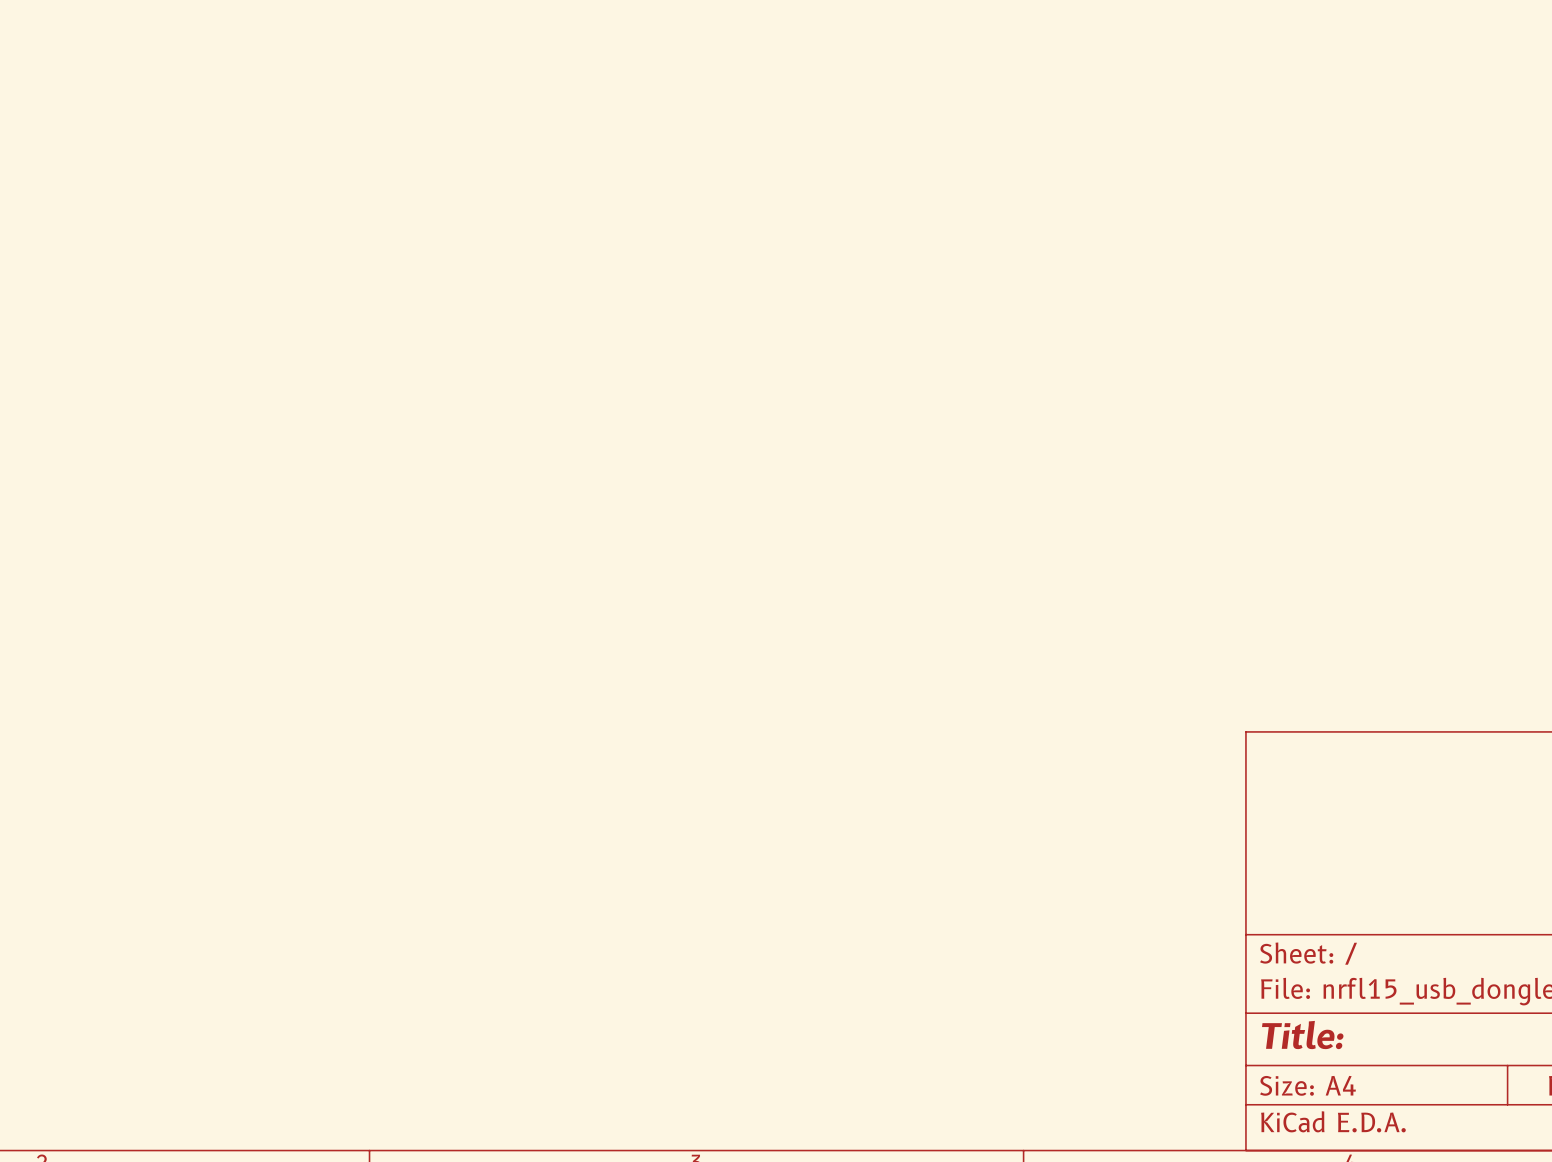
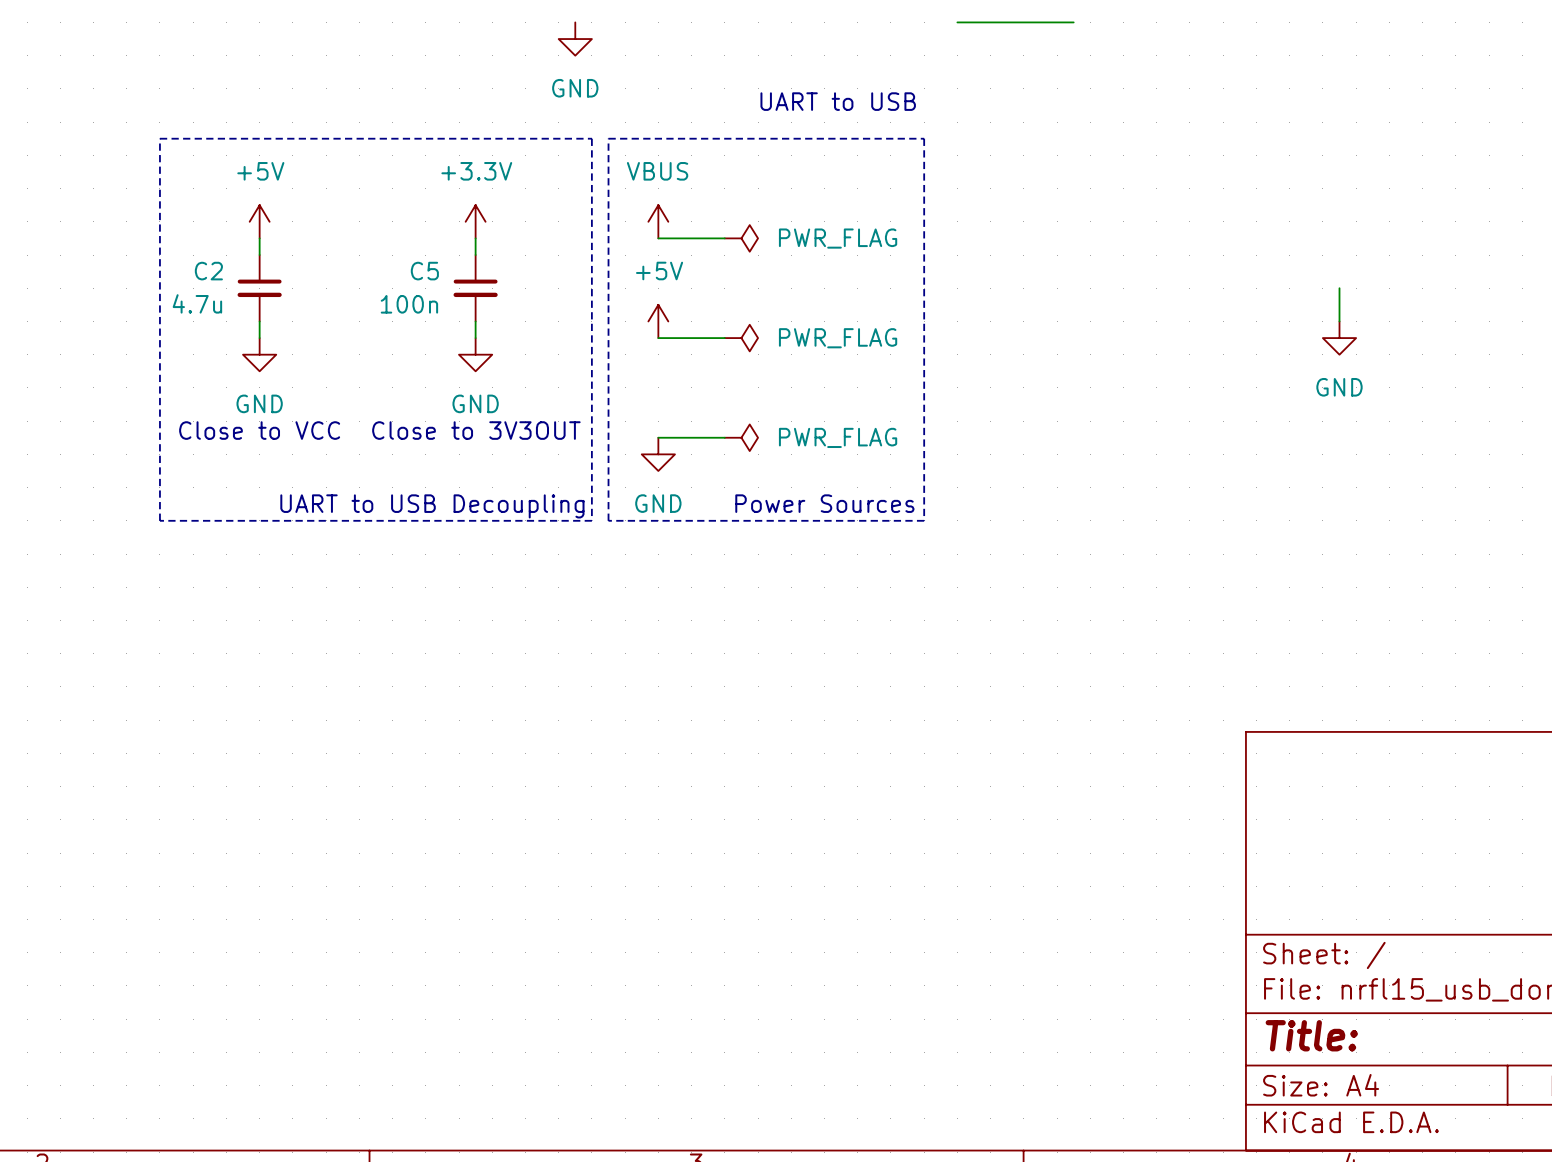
wire: none -> (957, 22) (1073, 22)
power symbol: none -> GND (575, 39)
text: none -> UART to USB (838, 101)
line: none -> (159, 138) (591, 138) (591, 520) (159, 520) (159, 138)
line: none -> (608, 138) (924, 138) (924, 520) (608, 520) (608, 138)
power symbol: none -> +5V (259, 221)
power symbol: none -> +3.3V (475, 221)
power symbol: none -> VBUS (658, 221)
wire: none -> (259, 238) (259, 255)
wire: none -> (475, 238) (475, 255)
wire: none -> (658, 238) (724, 238)
power symbol: none -> PWR_FLAG (741, 238)
C2: none -> 4.7u (259, 288)
C5: none -> 100n (475, 288)
wire: none -> (1339, 288) (1339, 321)
wire: none -> (259, 321) (259, 338)
wire: none -> (475, 321) (475, 338)
power symbol: none -> +5V (658, 321)
wire: none -> (658, 338) (724, 338)
power symbol: none -> PWR_FLAG (741, 338)
power symbol: none -> GND (1339, 338)
power symbol: none -> GND (259, 354)
power symbol: none -> GND (475, 354)
text: none -> Close to VCC (259, 430)
text: none -> Close to 3V3OUT (476, 430)
wire: none -> (658, 437) (724, 437)
power symbol: none -> PWR_FLAG (741, 437)
power symbol: none -> GND (658, 454)
text: none -> Power Sources (824, 503)
text: none -> UART to USB Decoupling (432, 506)

